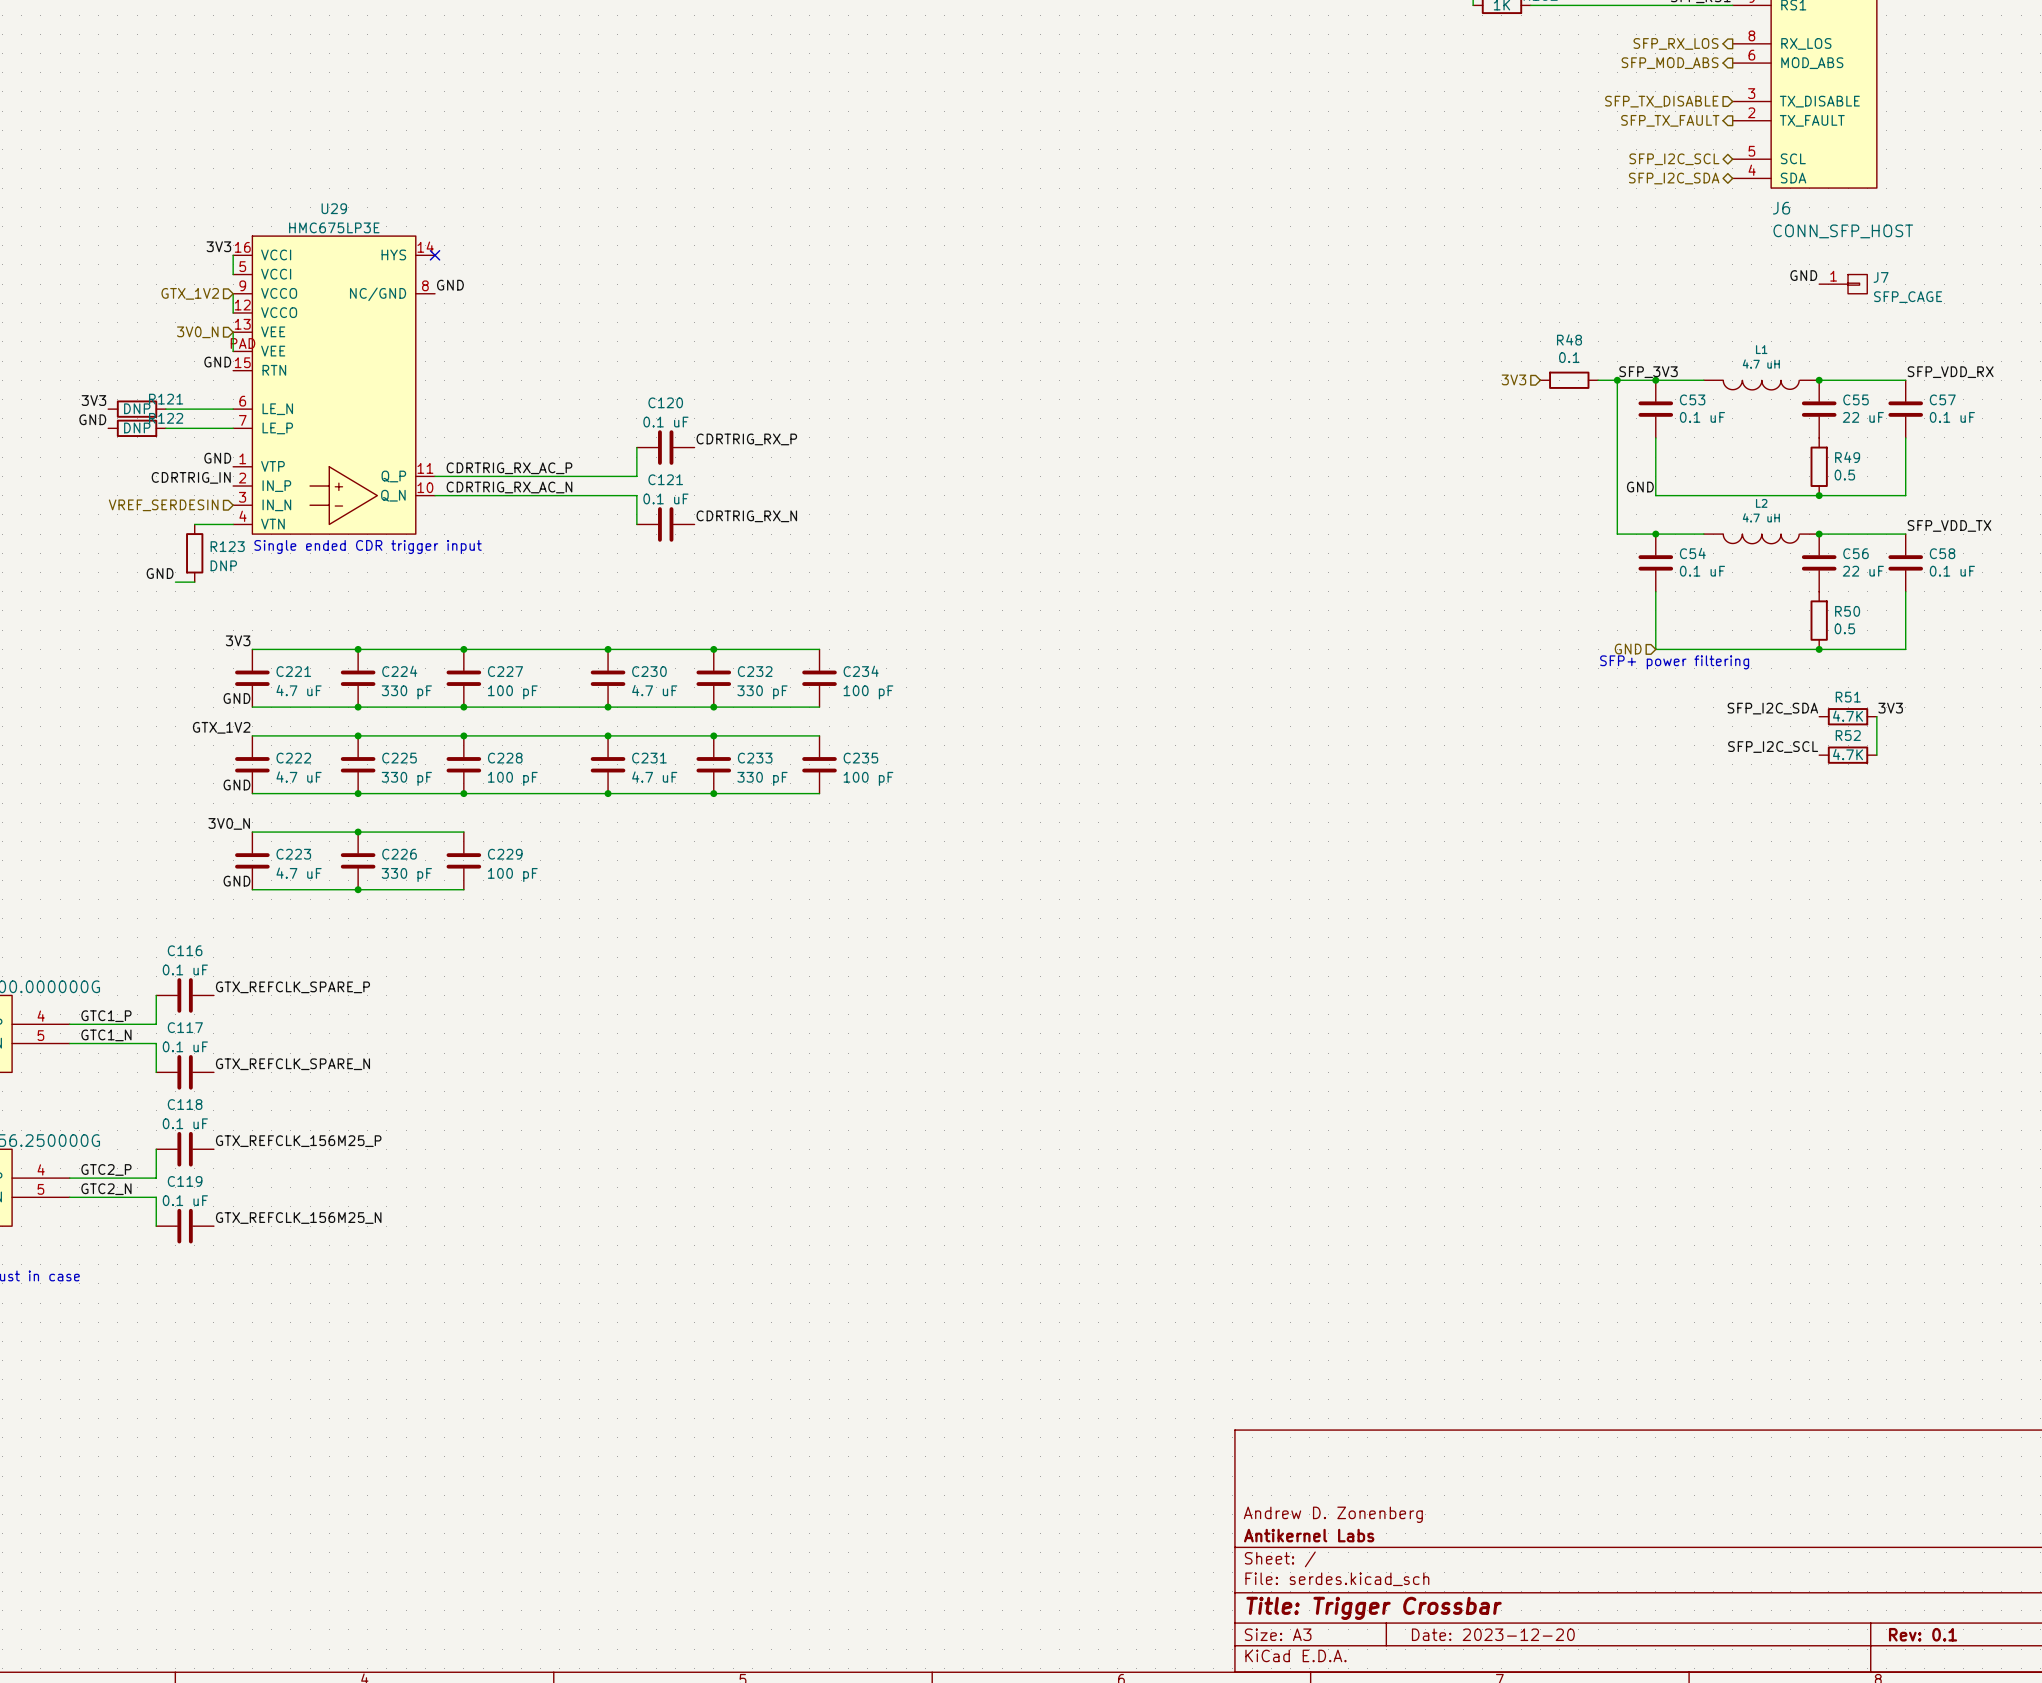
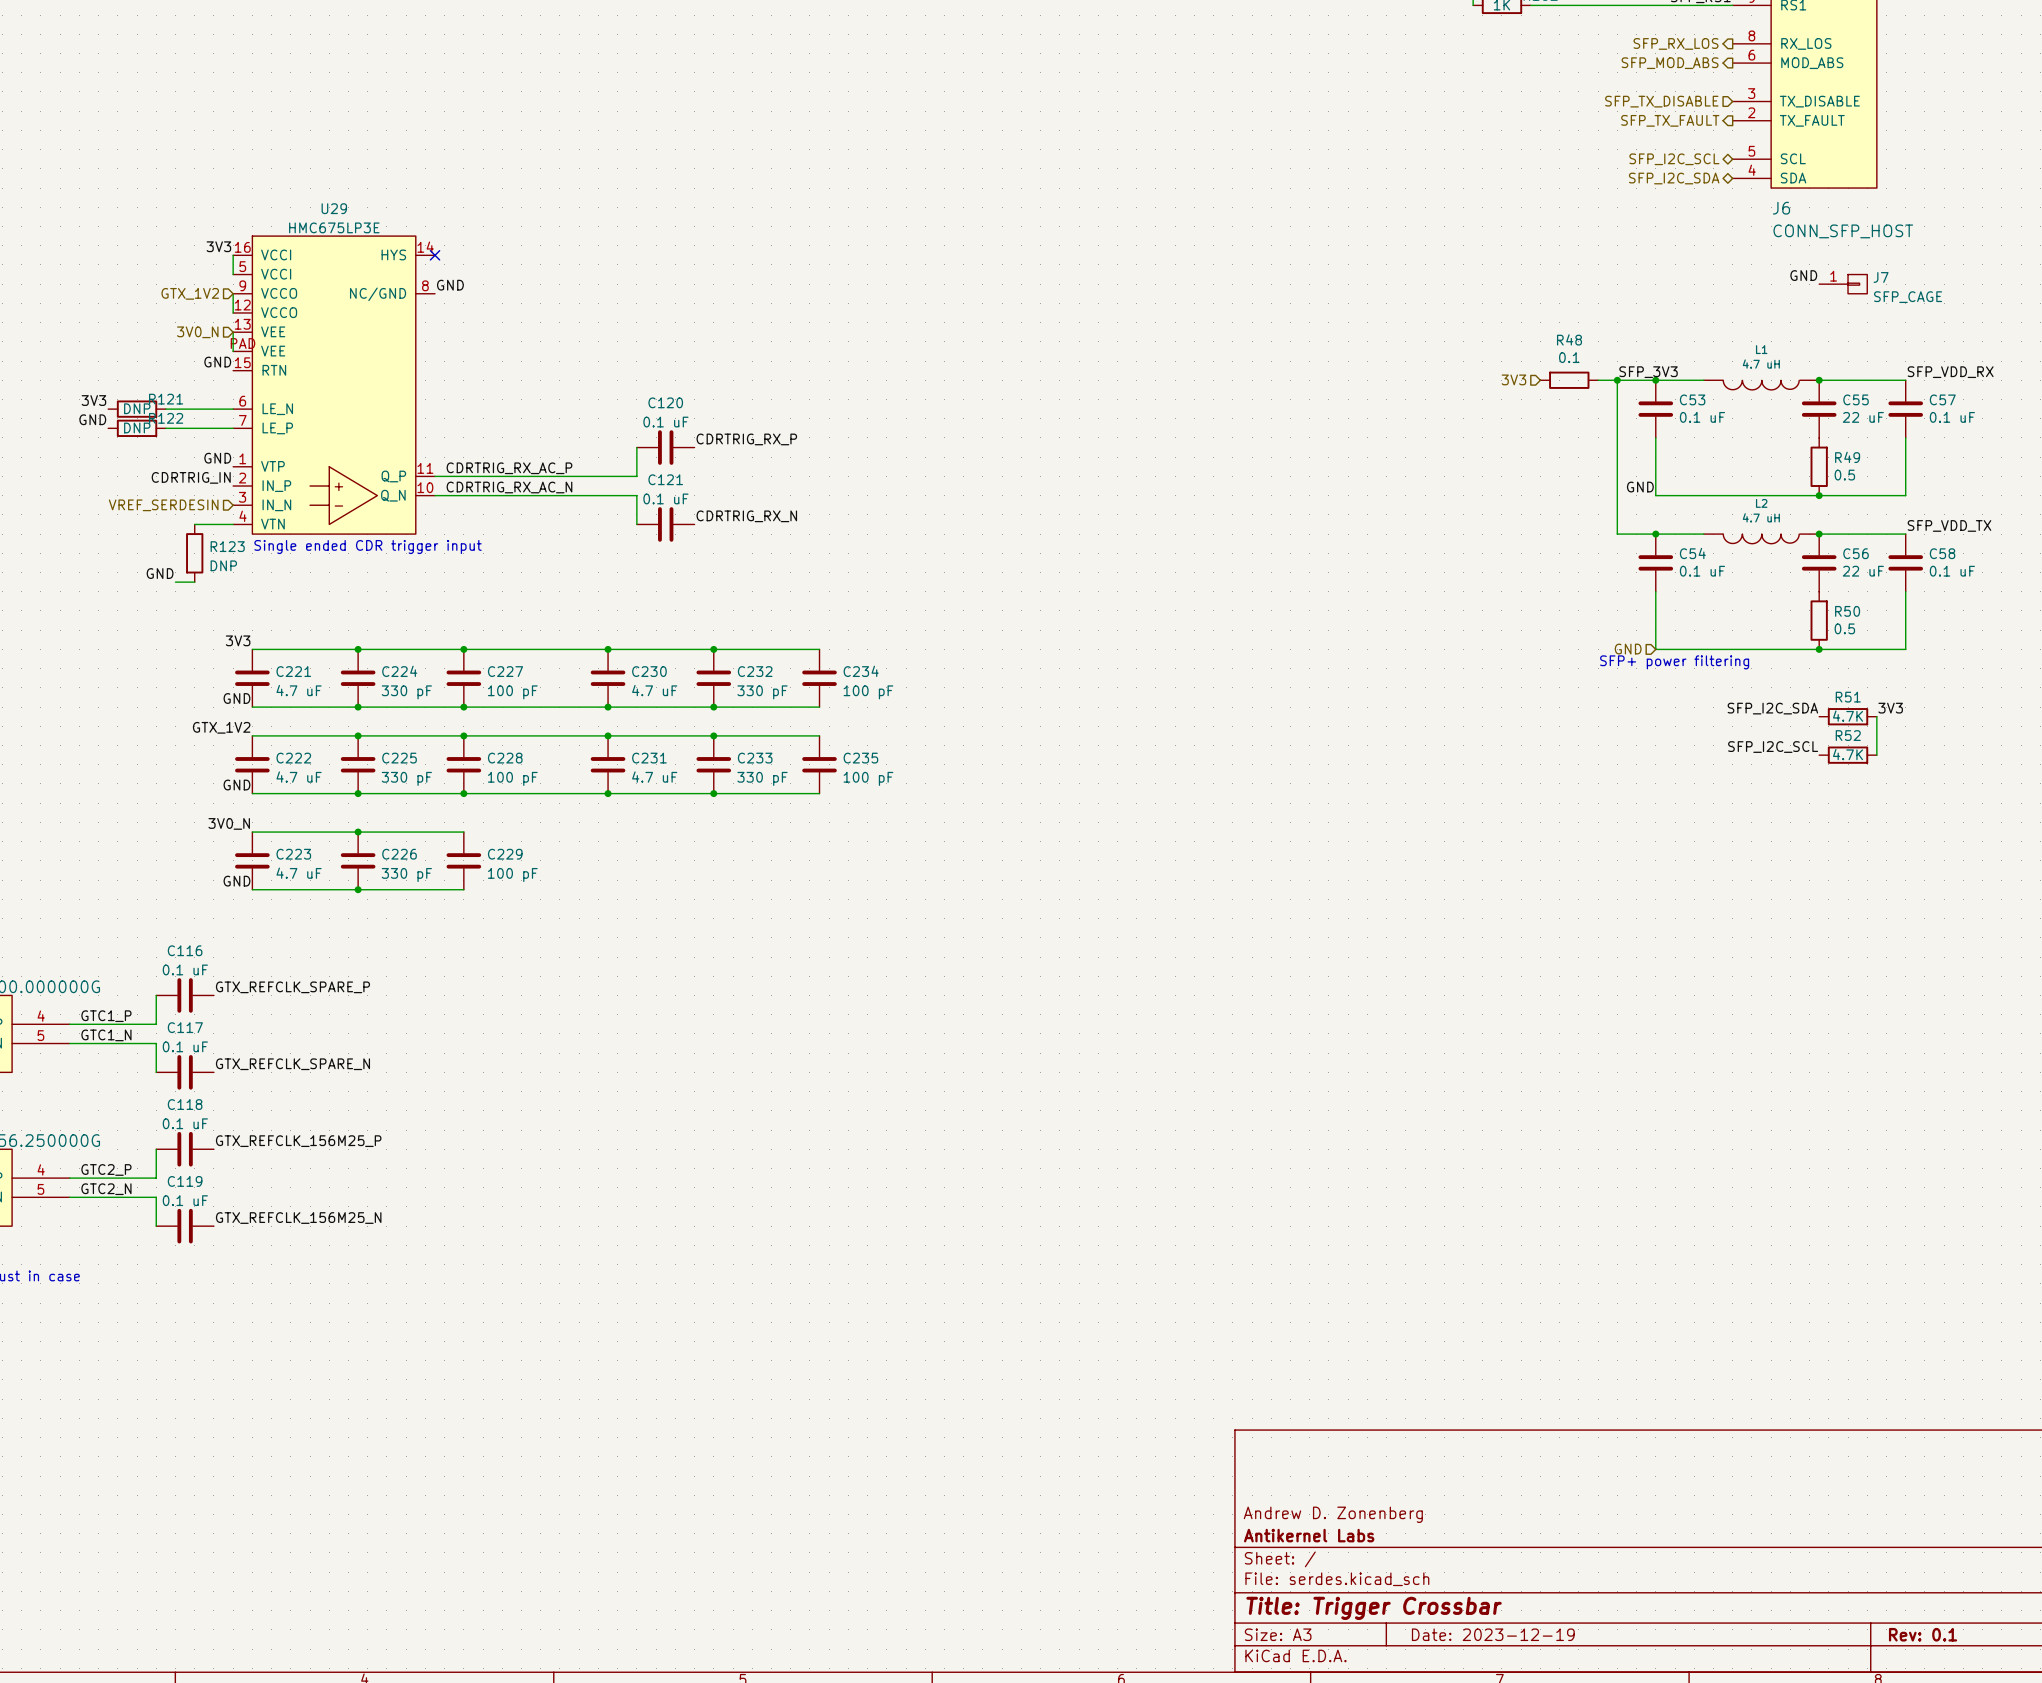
title block: Date: 2023-12-20 (1493, 1634) -> Date: 2023-12-19 (1493, 1634)

